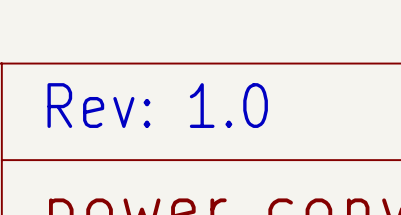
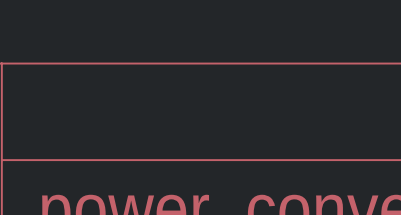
text: Rev: 1.0 (157, 105) -> none

